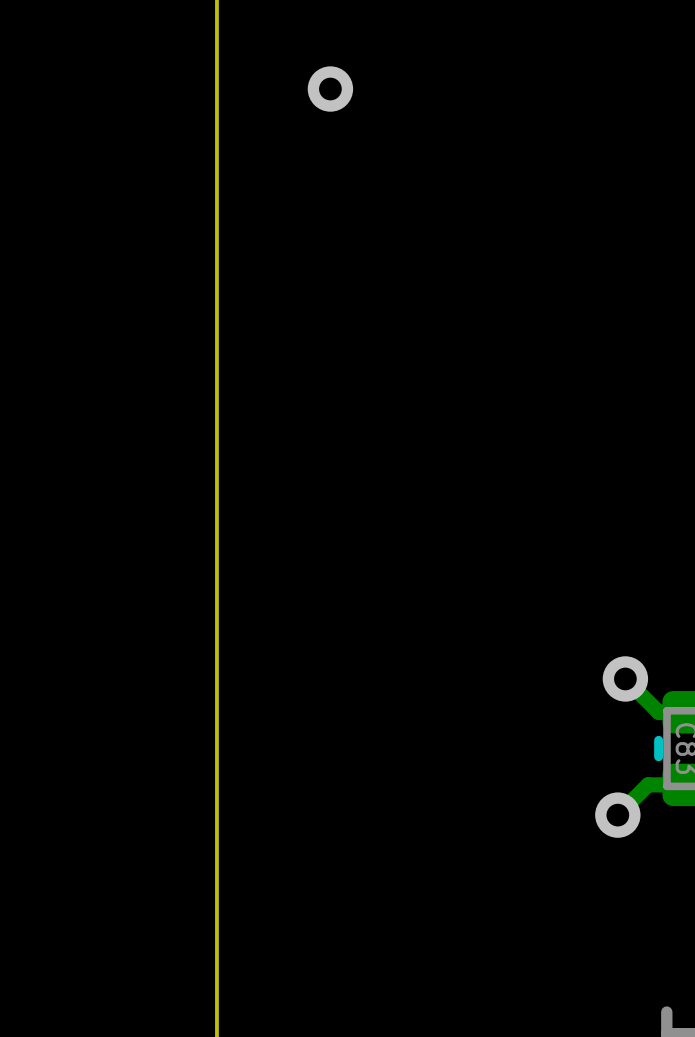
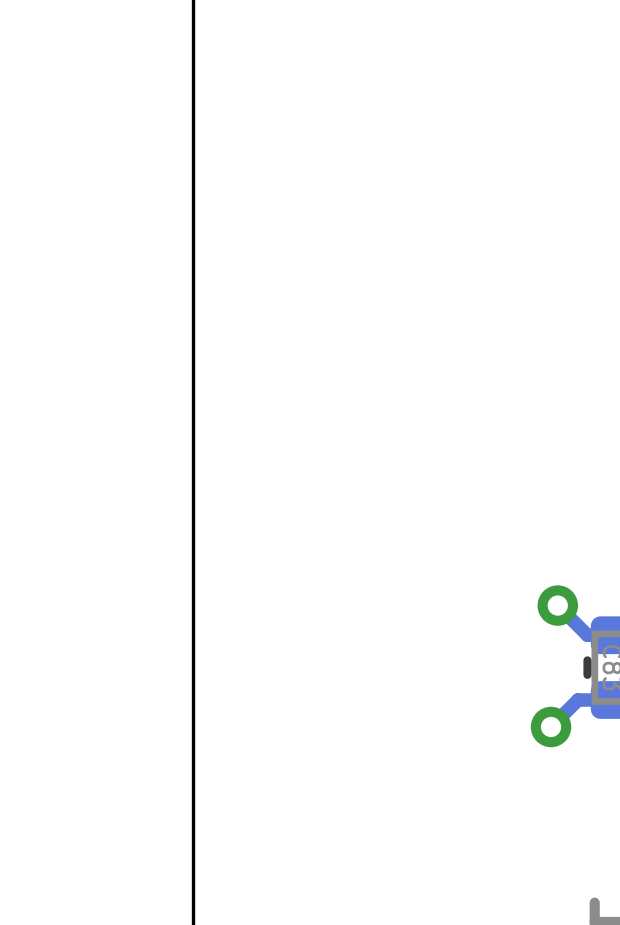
via: (330, 89) -> none

